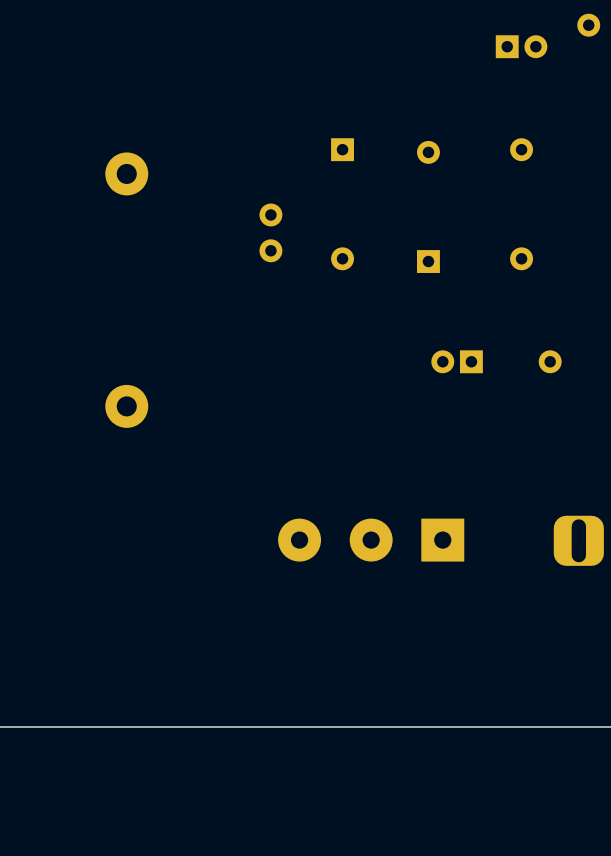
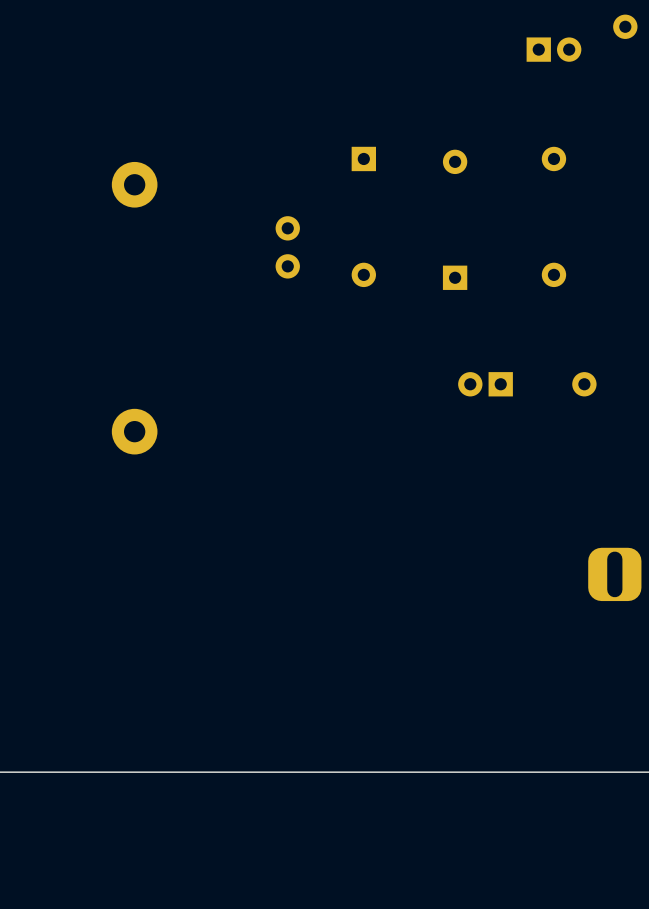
part: (371, 540) -> none

